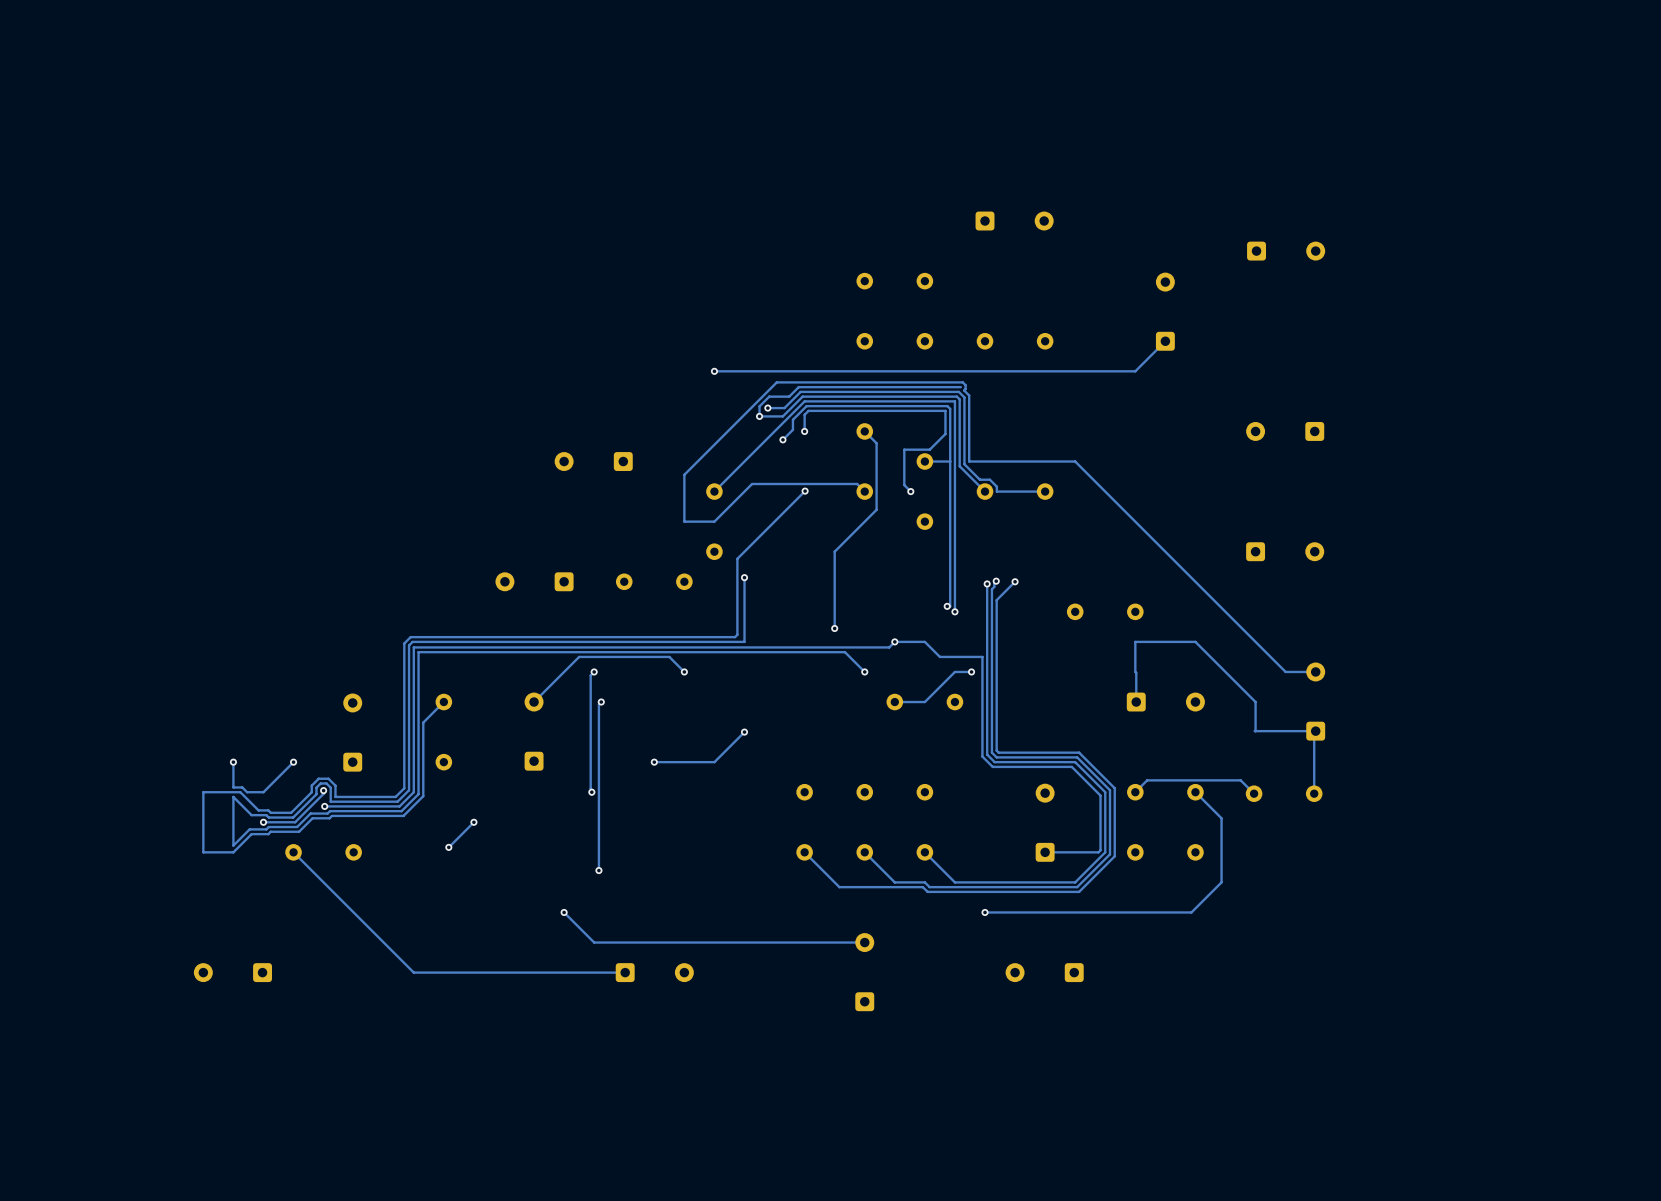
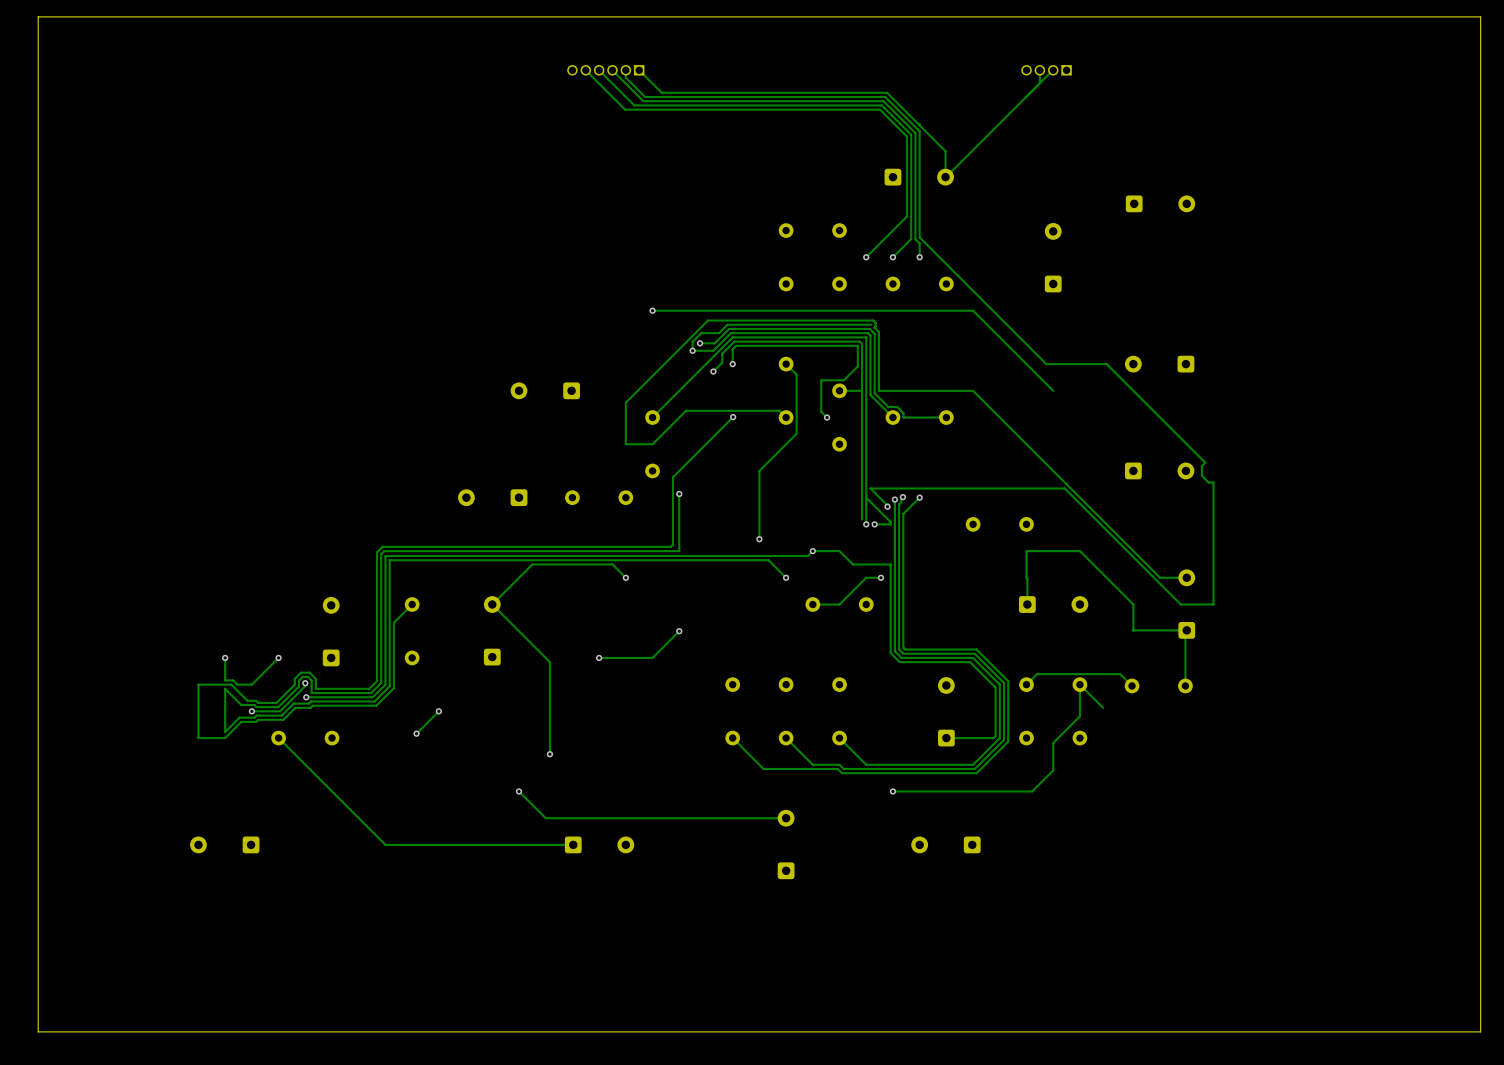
board edge: none -> (1480, 16) (38, 16) (38, 1031) (1480, 1031) (1480, 16)
track: none -> (585, 70) (625, 109) (880, 109) (907, 136) (907, 216) (866, 257)
track: none -> (599, 70) (634, 105) (881, 105) (911, 134) (911, 238) (892, 257)
part: none -> (605, 70)
track: none -> (612, 70) (643, 101) (883, 101) (915, 133) (915, 239) (919, 243) (919, 257)
track: none -> (625, 70) (625, 77) (645, 97) (885, 97) (919, 131) (919, 237) (1046, 364) (1106, 364) (1205, 462) (1201, 466) (1201, 475) (1208, 482) (1213, 482) (1213, 604) (1180, 604) (1064, 488) (870, 488) (887, 506)
track: none -> (1039, 70) (1039, 83)
part: none -> (1046, 70)
track: none -> (1053, 70) (945, 177) (945, 151) (887, 92) (661, 92) (639, 70)
track: none -> (919, 123) (919, 125)
via: none -> (866, 257)
via: none -> (892, 257)
via: none -> (919, 257)
track: (1165, 341) (1135, 371) (1075, 371) -> (1053, 390) (973, 310)
track: none -> (866, 497) (890, 522) (890, 524) (874, 524)
via: none -> (887, 506)
via: (947, 606) -> none
via: none -> (874, 524)
track: (594, 671) (590, 675) (590, 788) (594, 792) -> none
via: (594, 671) -> none
track: (601, 702) (598, 704) (598, 766) -> (492, 604) (549, 662)
via: (601, 702) -> none
via: (591, 792) -> none
track: (1221, 818) (1221, 882) (1191, 912) (1141, 912) -> (1079, 684) (1079, 716) (1053, 743) (1053, 770) (1032, 791)

